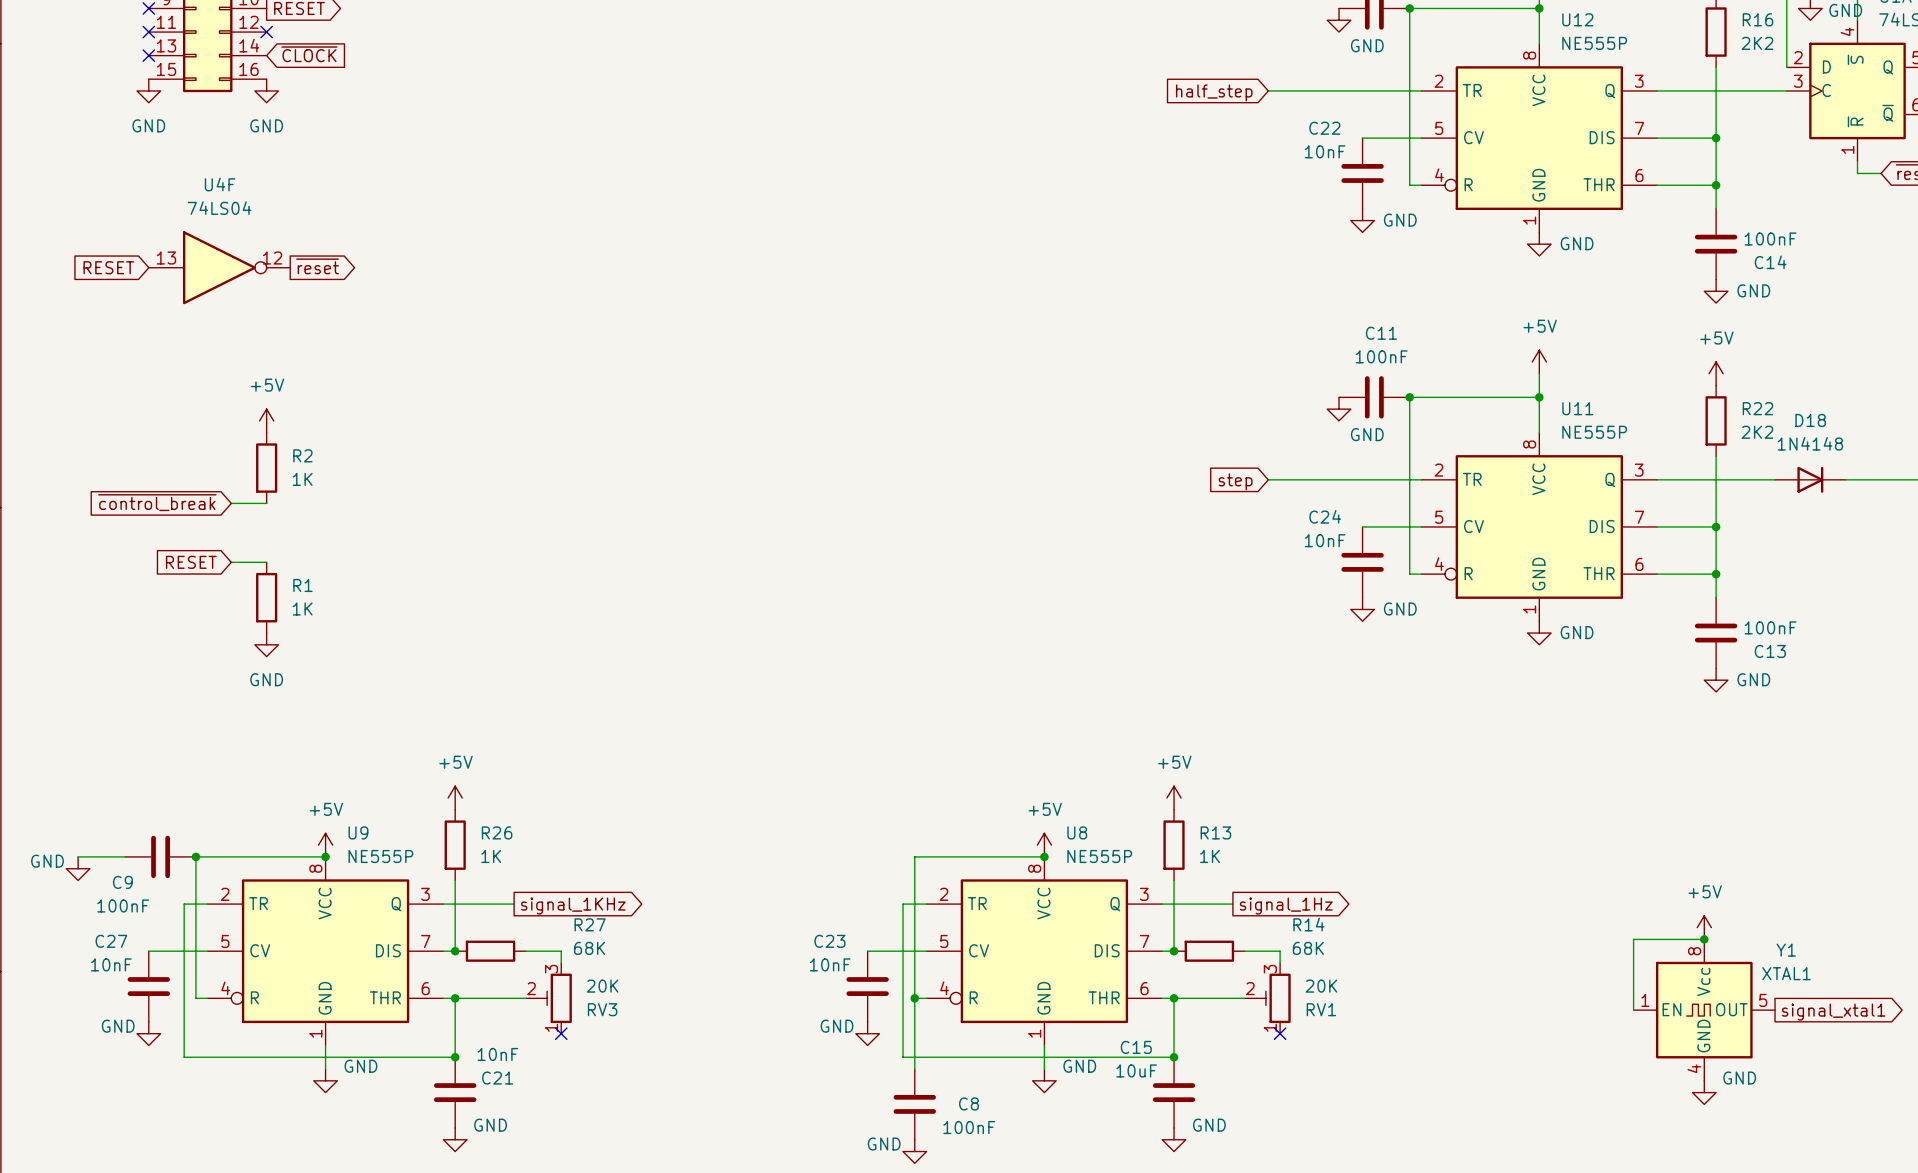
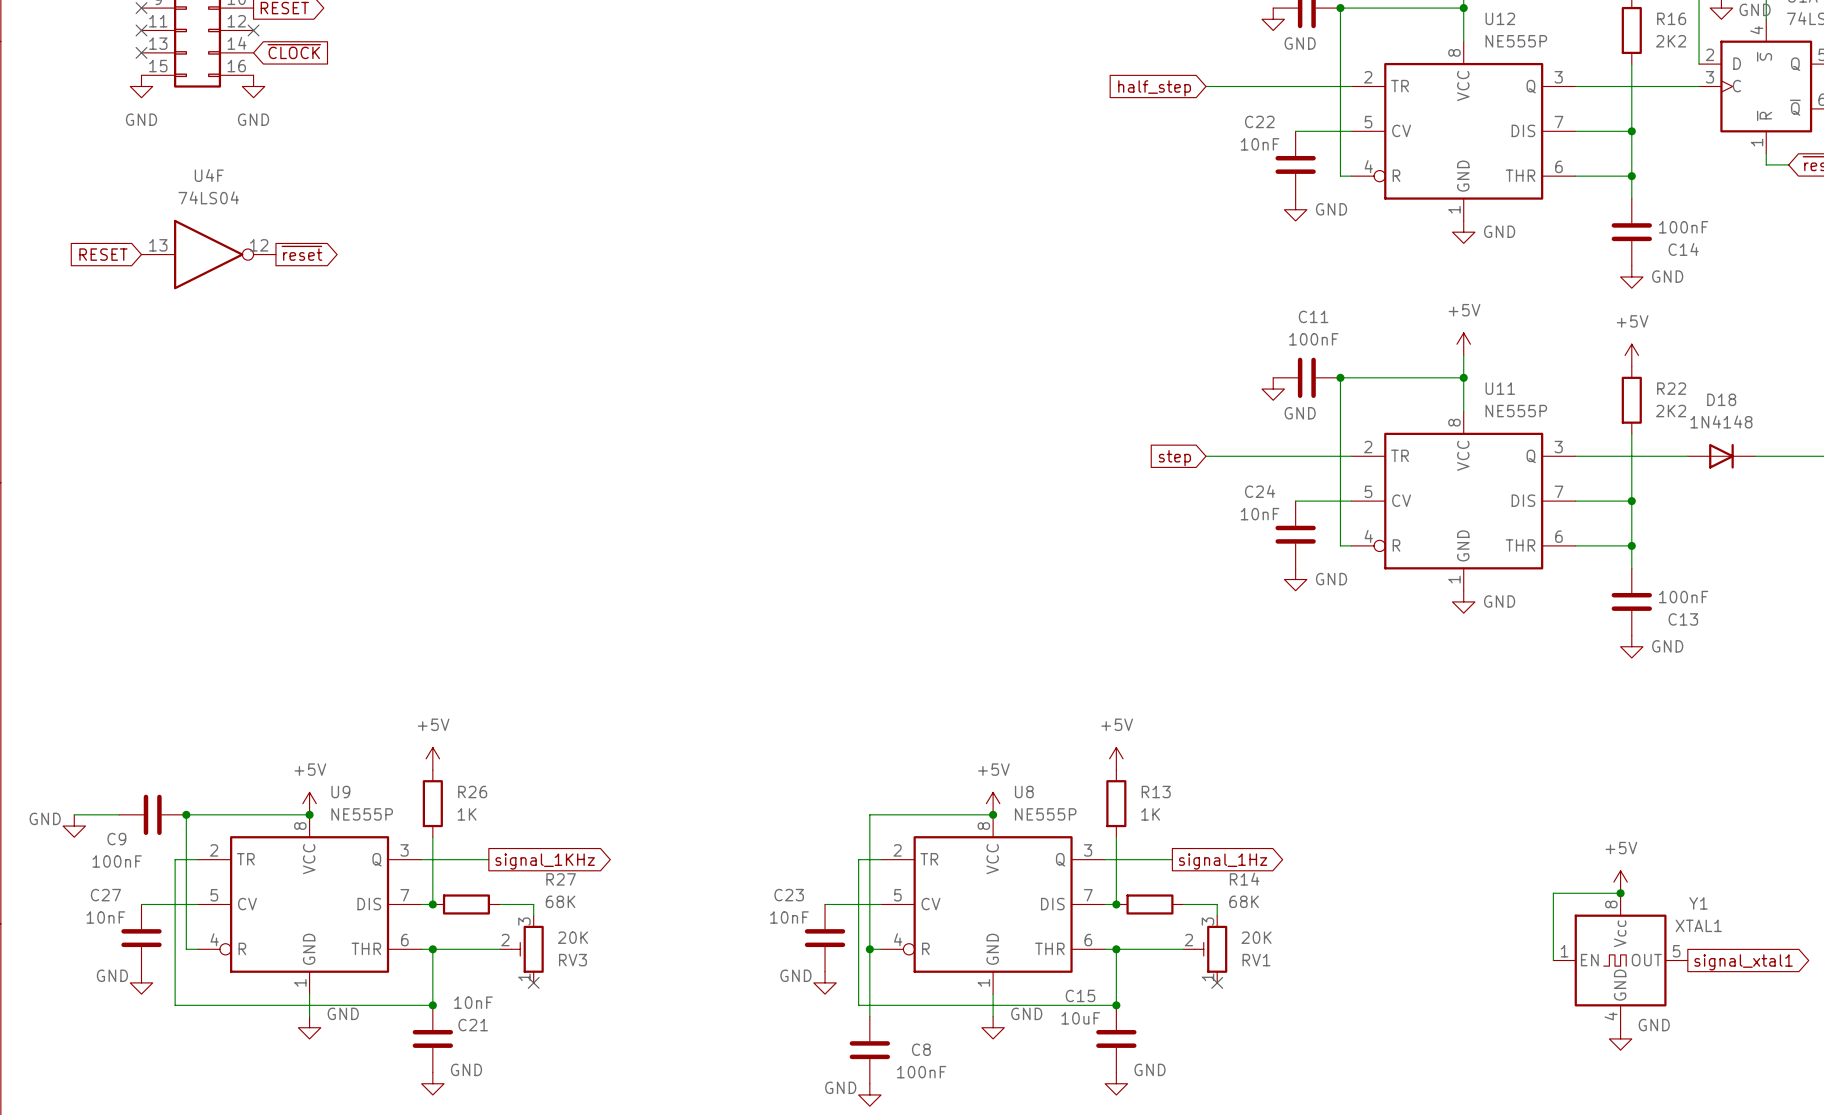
power symbol: +5V (266, 420) -> none
R2: 1K (266, 468) -> none
global label: ~{control_break} (157, 502) -> none
wire: (231, 503) (266, 503) -> none
global label: RESET (191, 562) -> none
wire: (231, 562) (266, 562) -> none
R1: 1K (266, 597) -> none
power symbol: GND (266, 644) -> none

